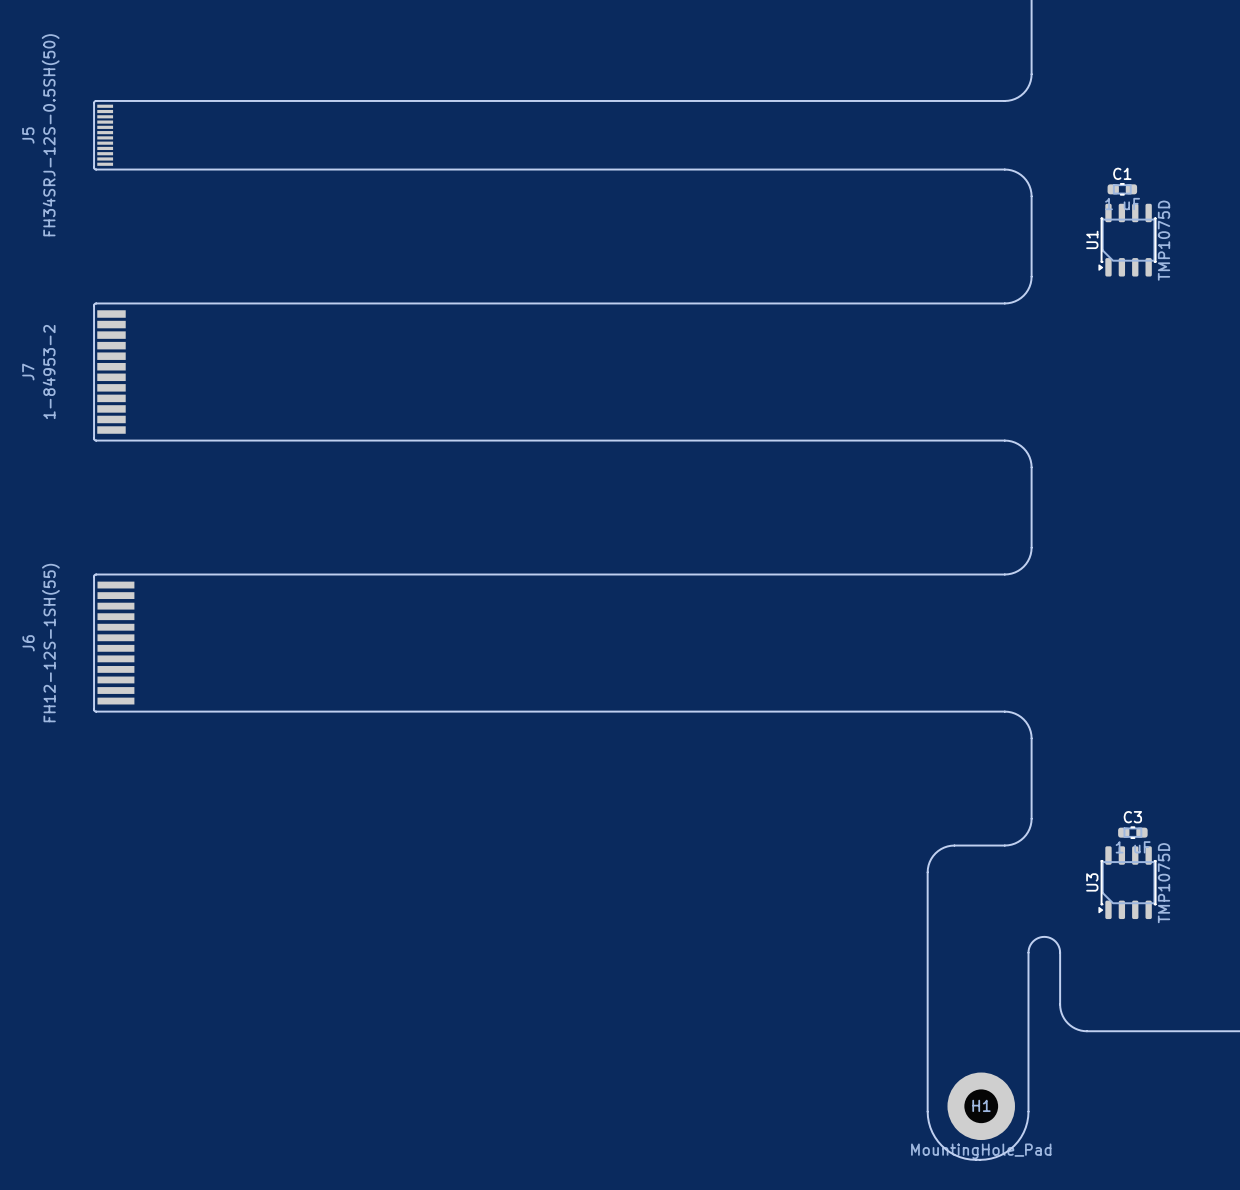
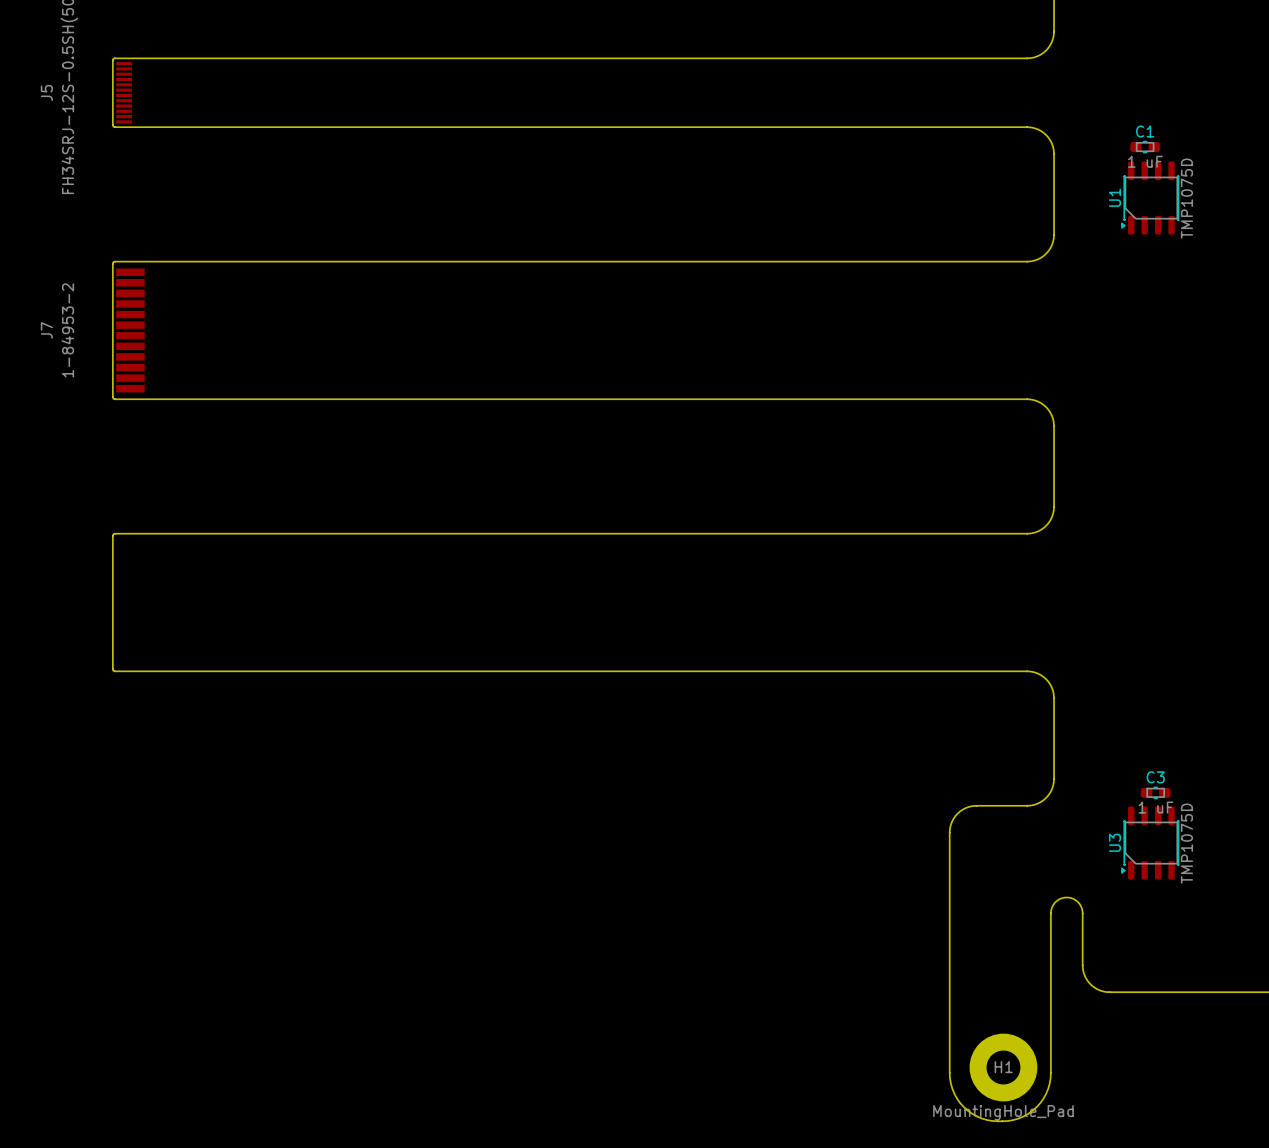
J6: FH12-12S-1SH(55) (115, 643) -> none

